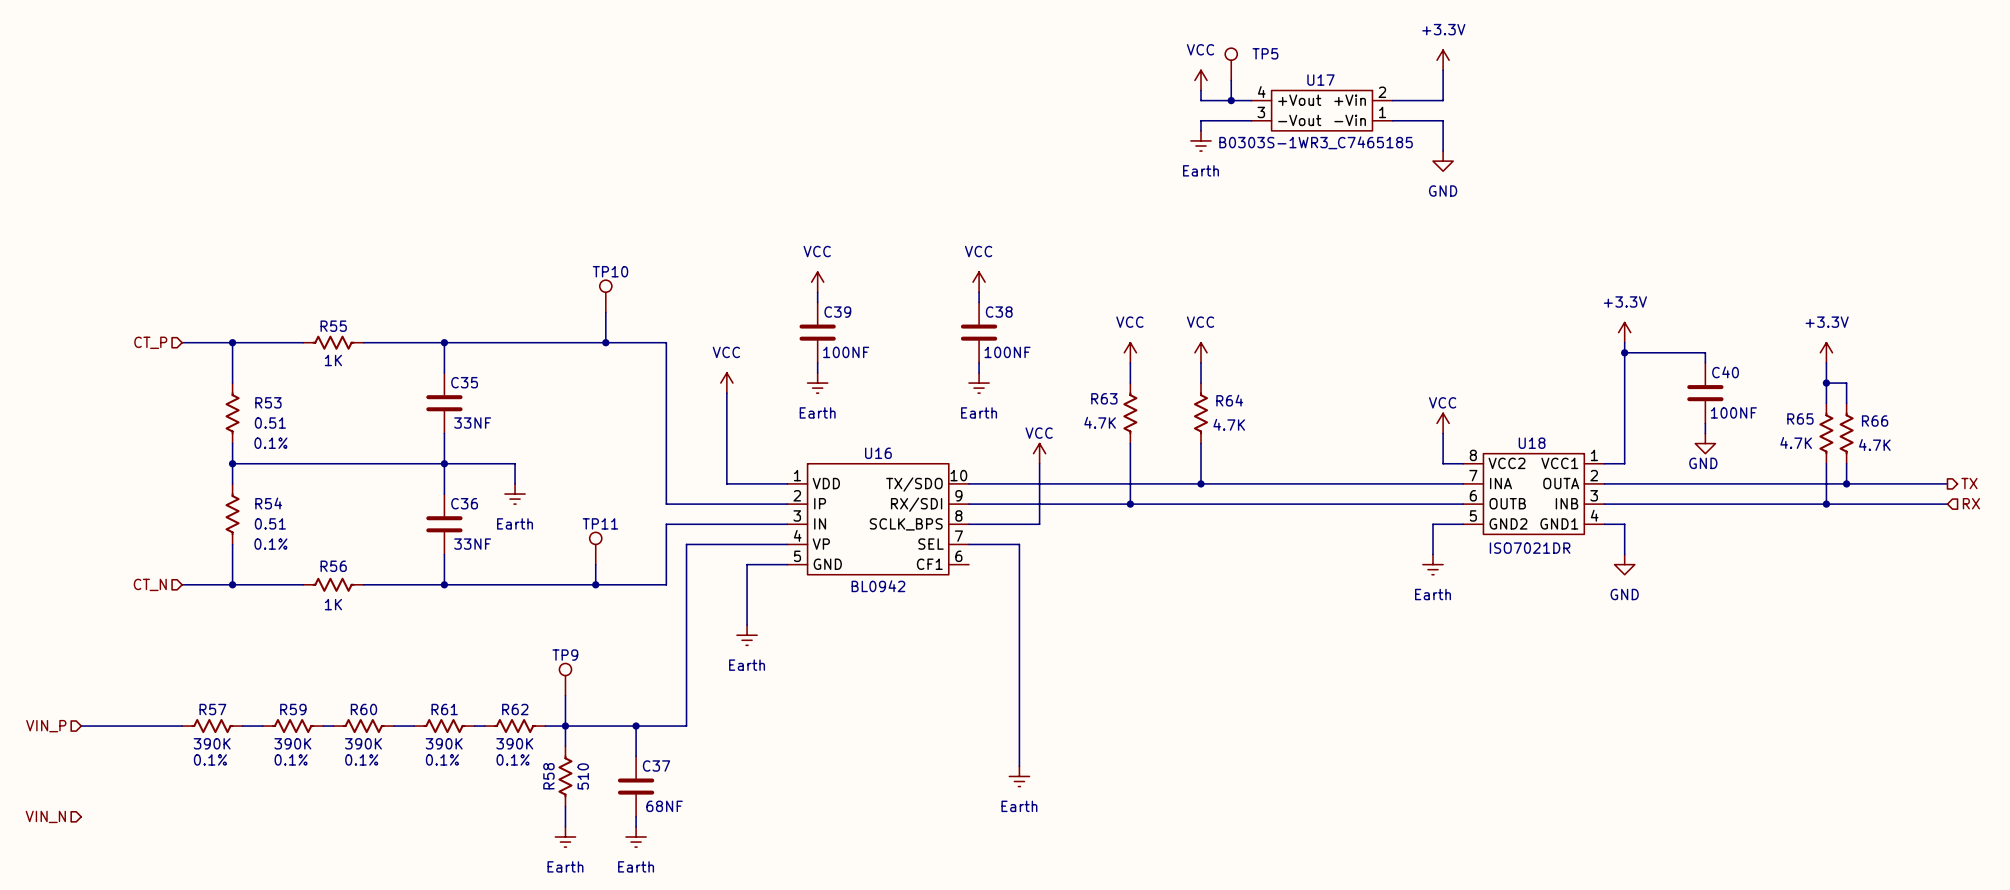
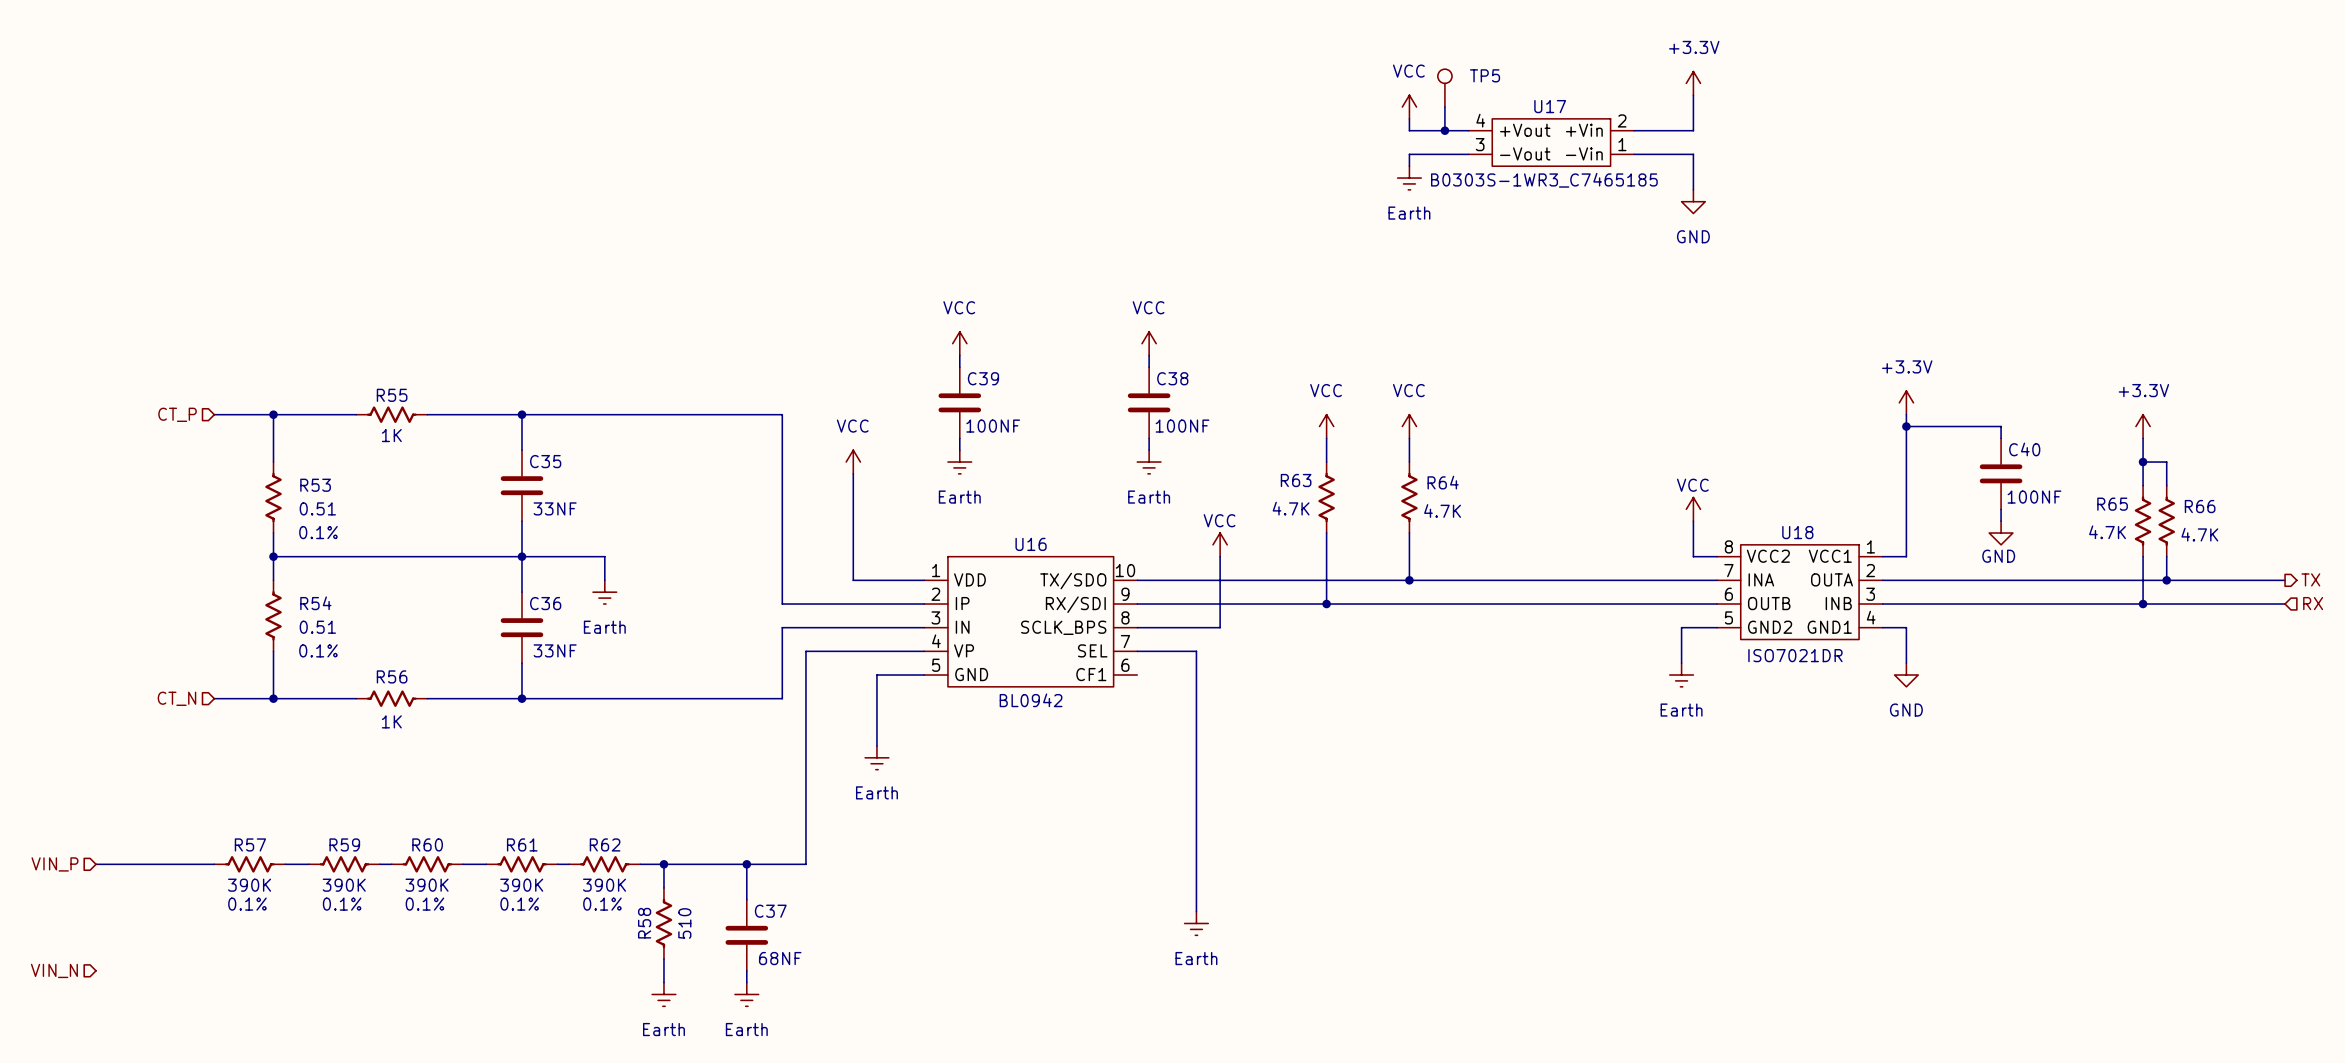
TP10: (605, 296) -> none
wire: (605, 312) (605, 342) -> none
junction: (605, 342) -> none
TP11: (595, 548) -> none
wire: (595, 564) (595, 584) -> none
junction: (595, 584) -> none
TP9: (565, 679) -> none
wire: (565, 695) (565, 726) -> none

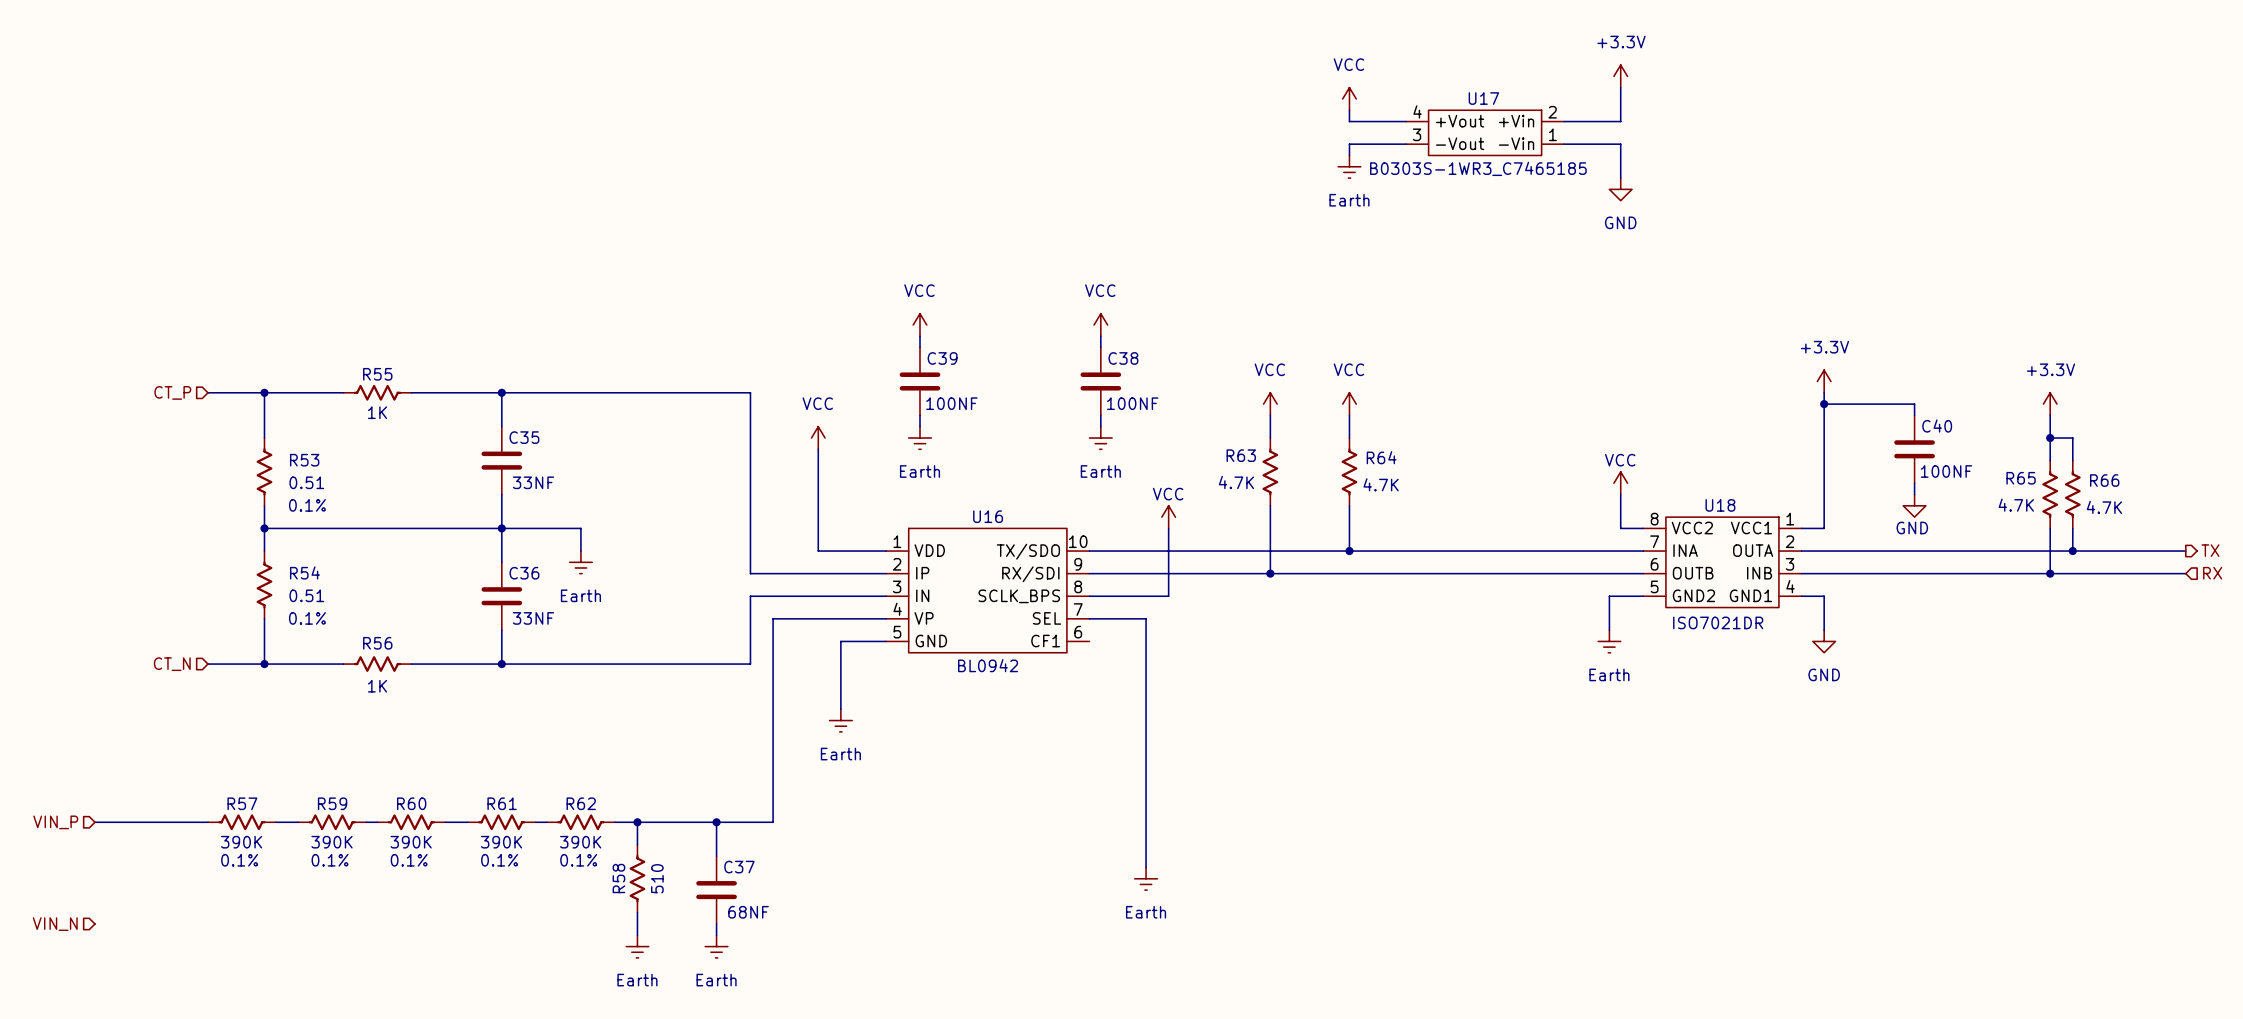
TP5: (1444, 88) -> none
wire: (1444, 107) (1444, 130) -> none
junction: (1444, 130) -> none

